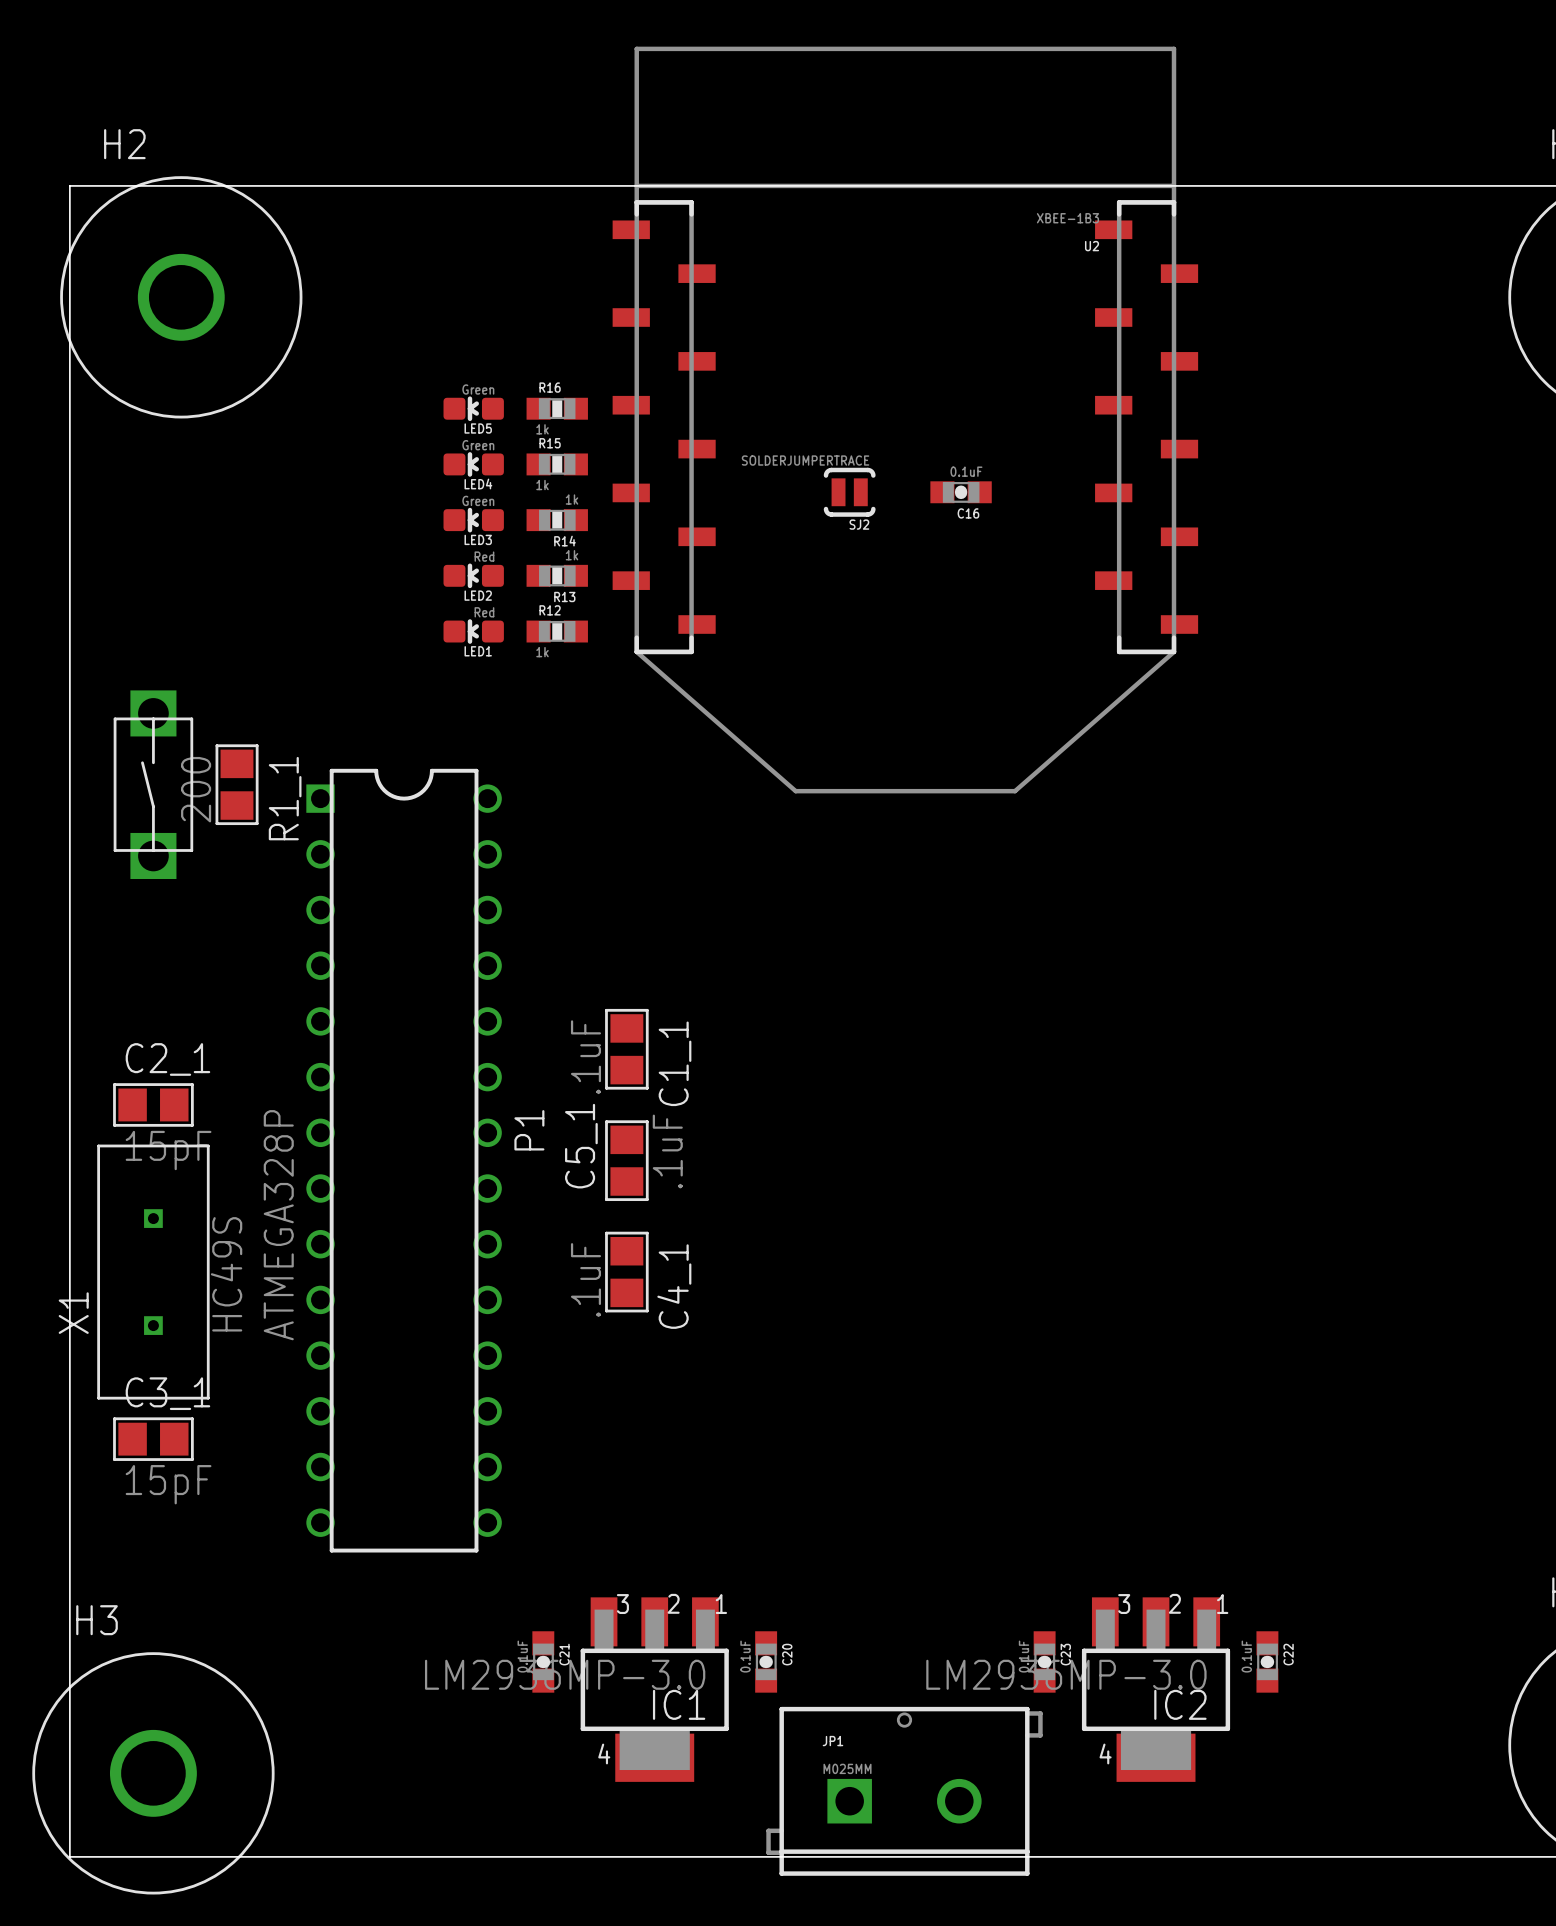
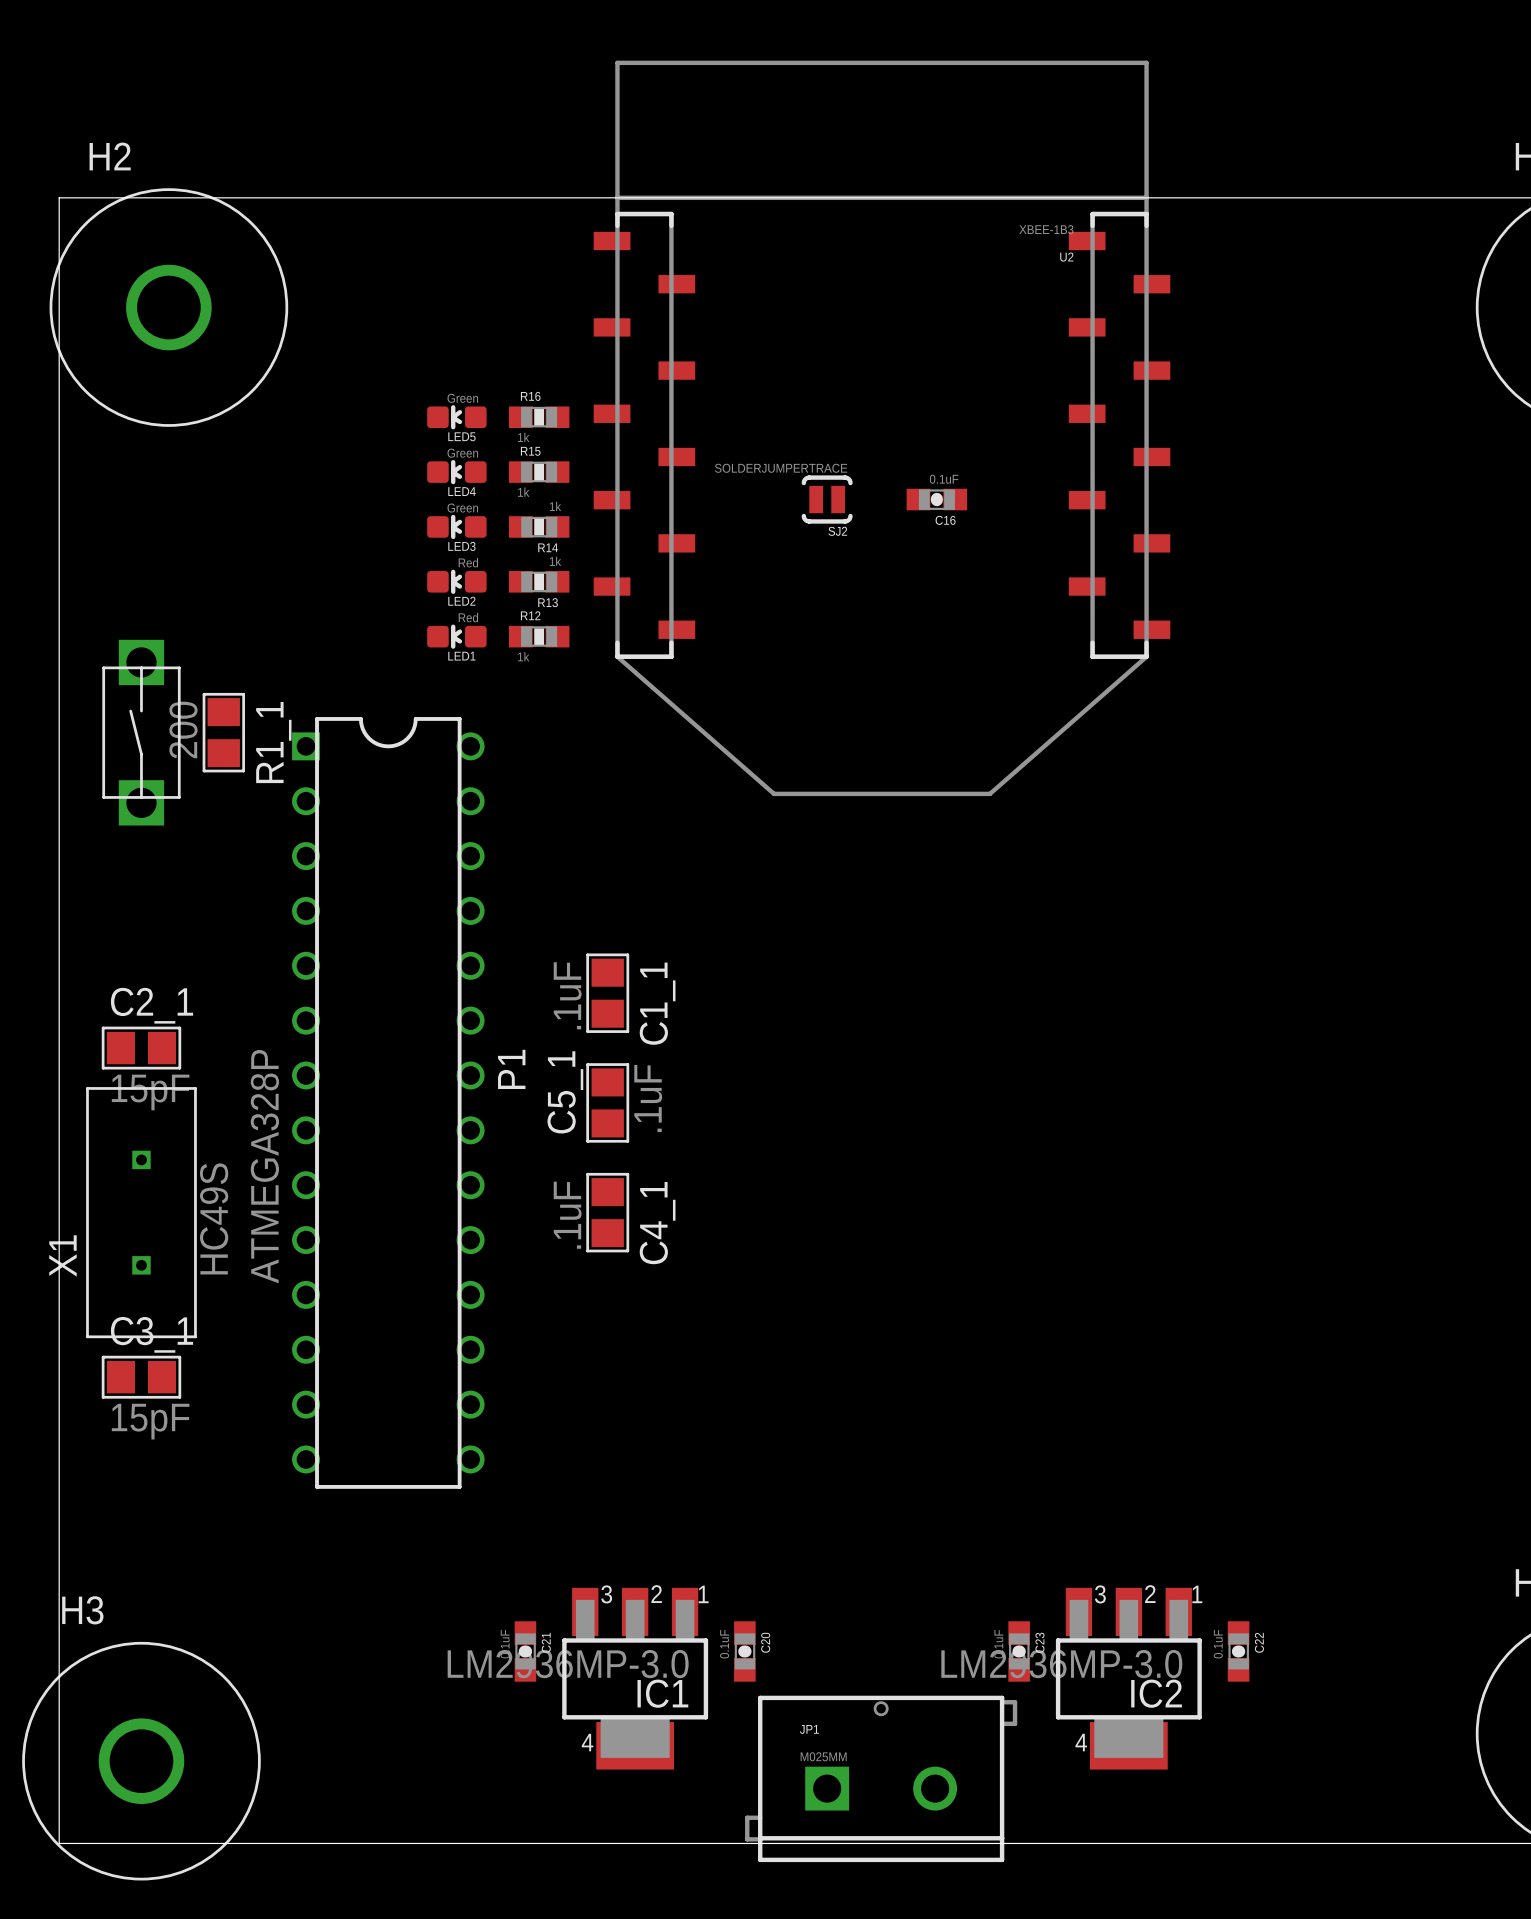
part position: (153, 784) -> (141, 732)
R1_1 position: (237, 784) -> (223, 732)
C1_1 position: (626, 1049) -> (607, 993)
C2_1 position: (153, 1104) -> (141, 1048)
P1 position: (404, 1160) -> (388, 1102)
C5_1 position: (626, 1160) -> (607, 1102)
X1 position: (153, 1272) -> (141, 1212)
C4_1 position: (626, 1272) -> (607, 1212)
C3_1 position: (153, 1439) -> (141, 1377)

